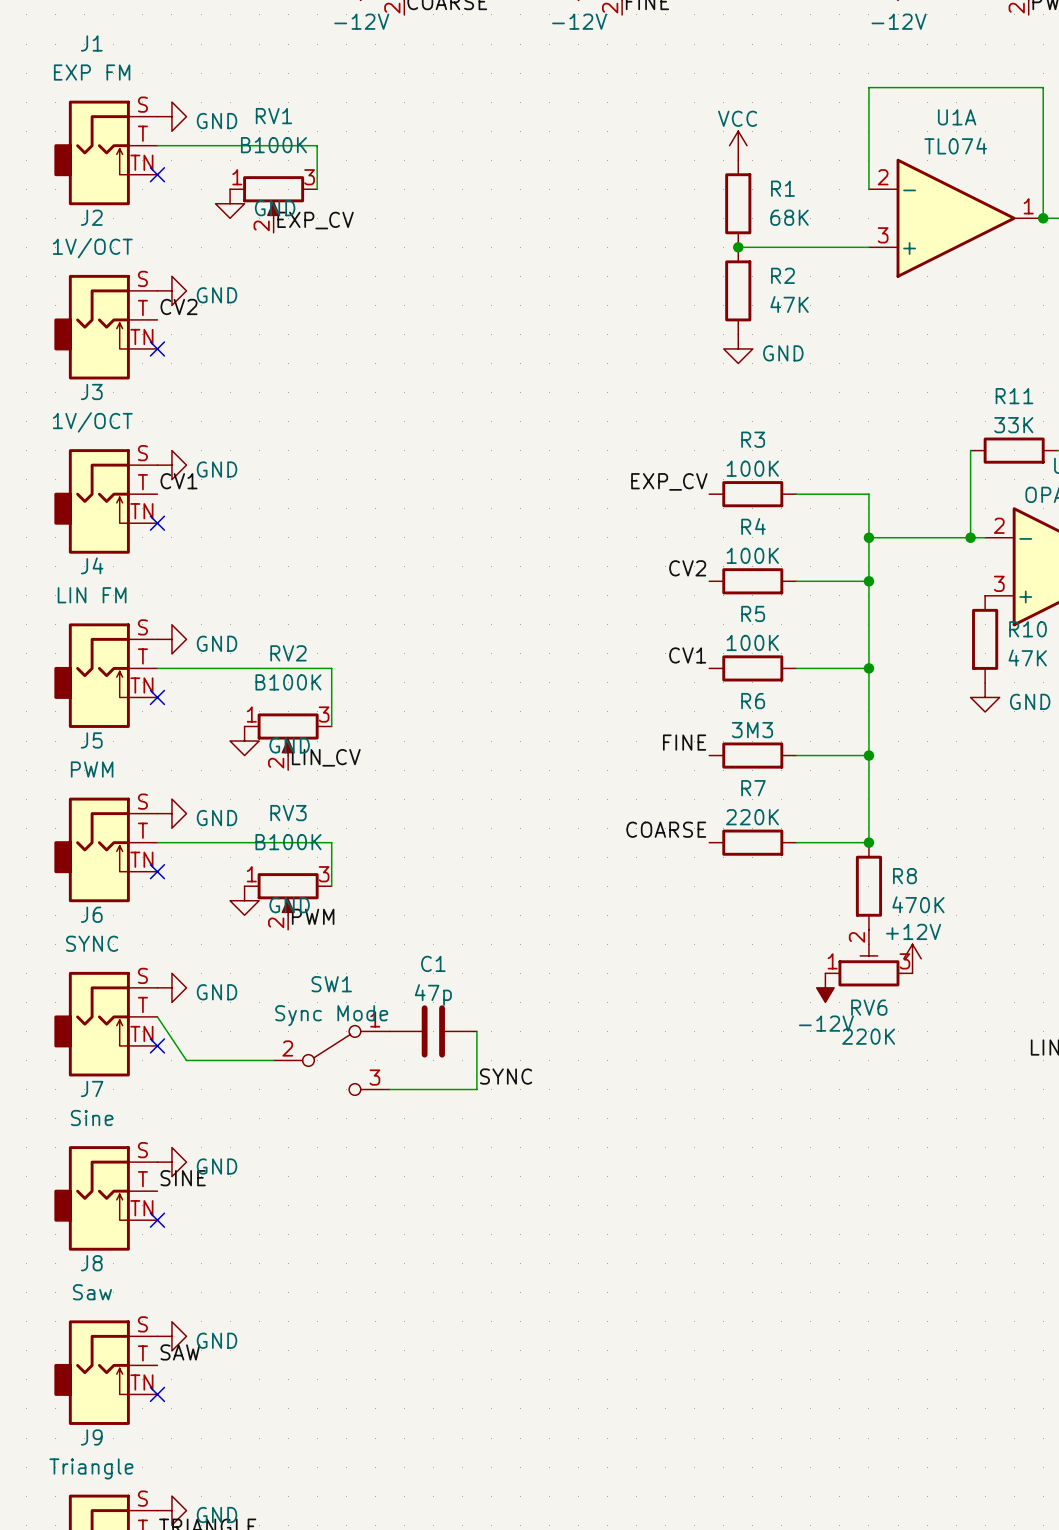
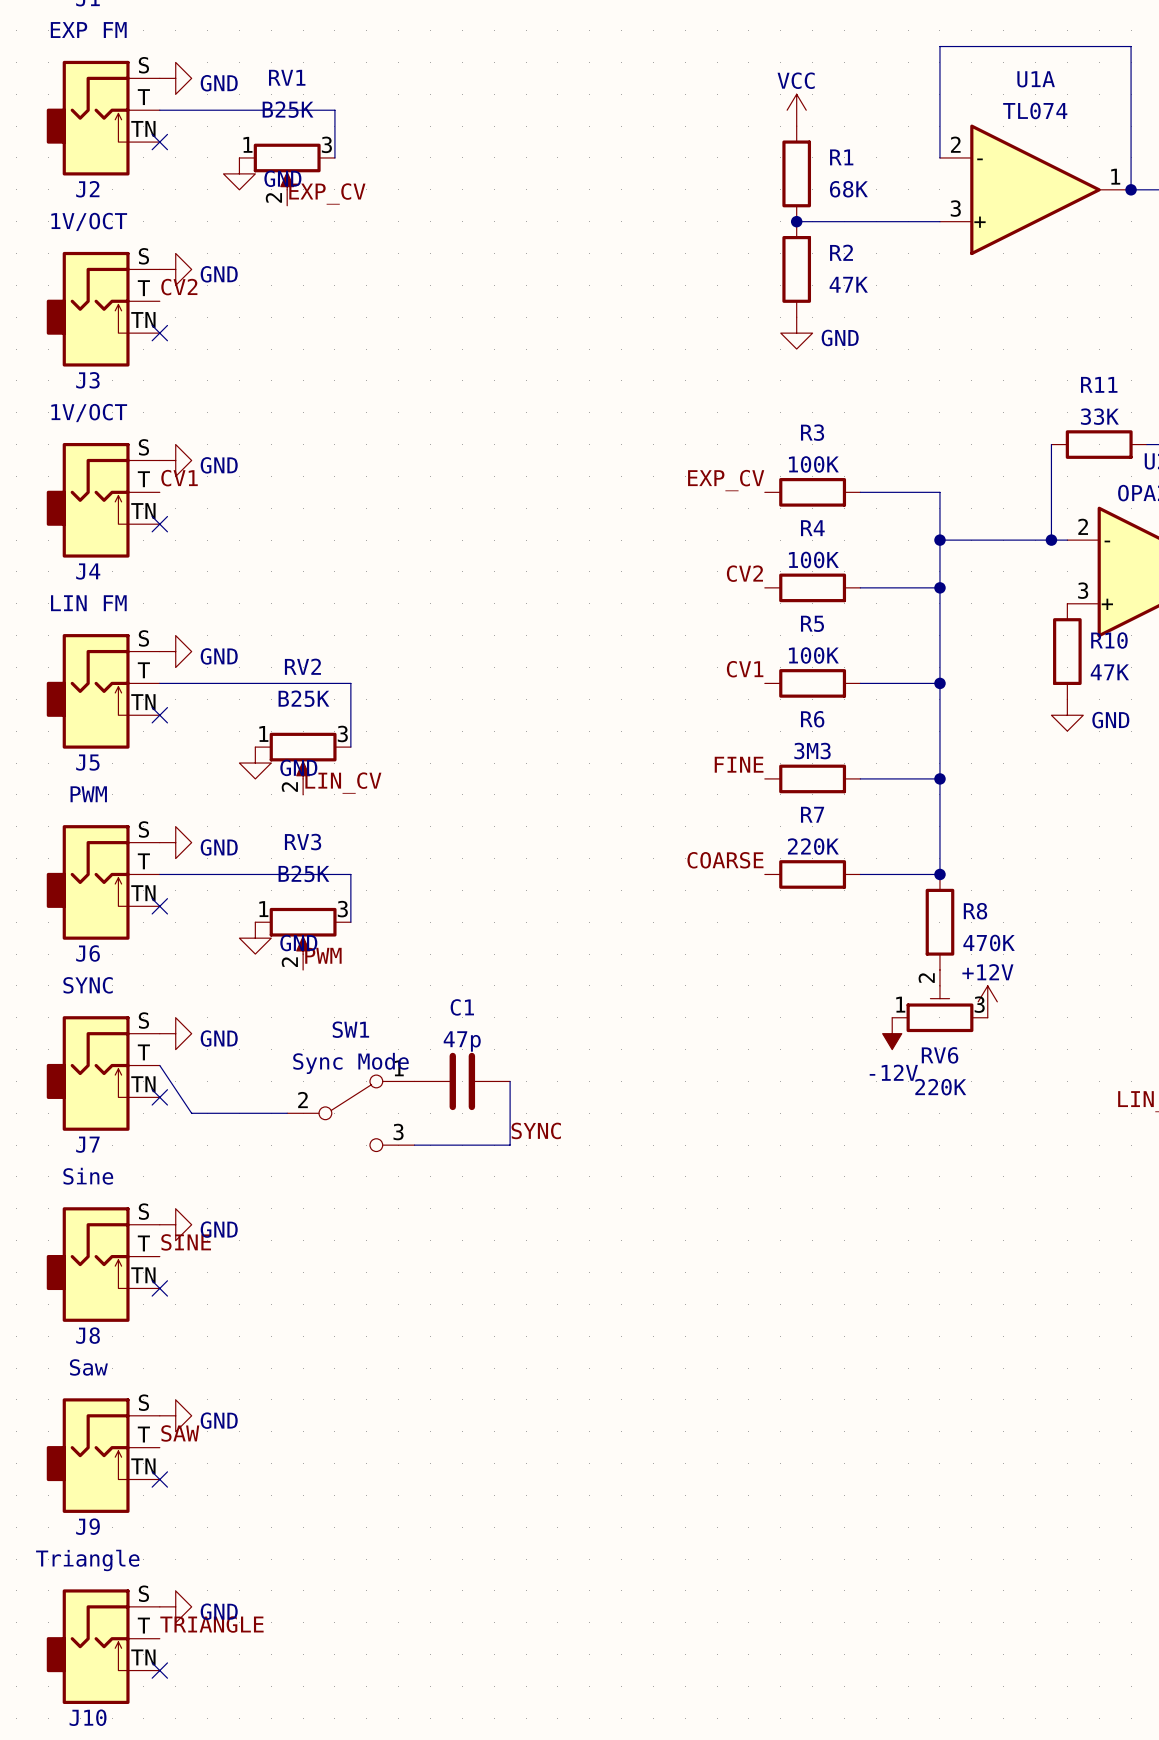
RV1 value: B100K (273, 145) -> B25K (288, 109)
RV2 value: B100K (288, 682) -> B25K (303, 698)
RV3 value: B100K (288, 842) -> B25K (303, 873)

